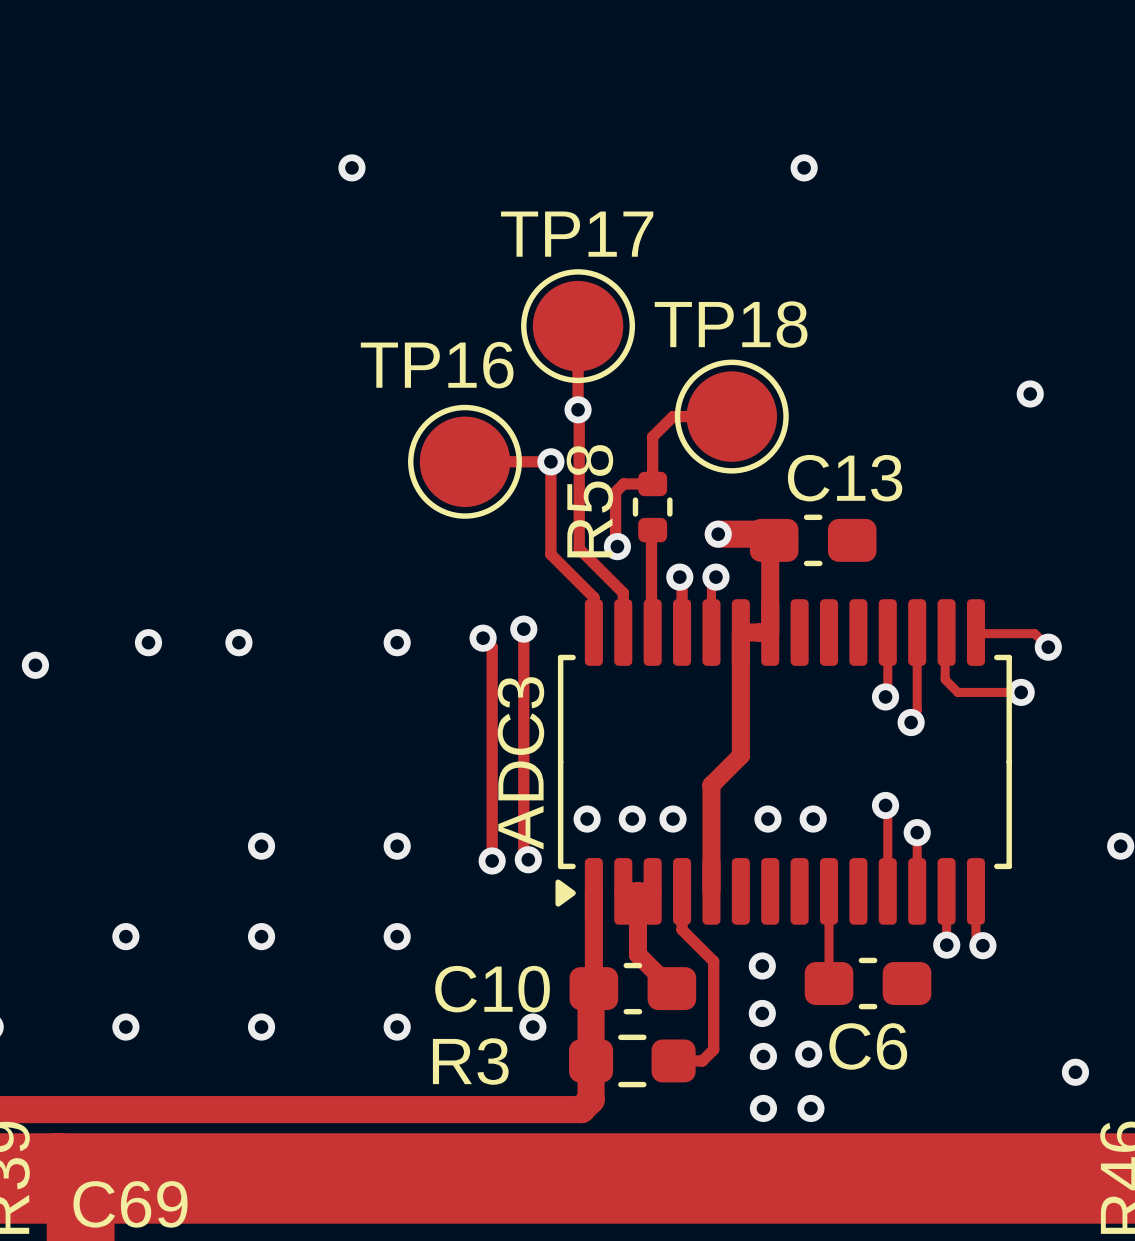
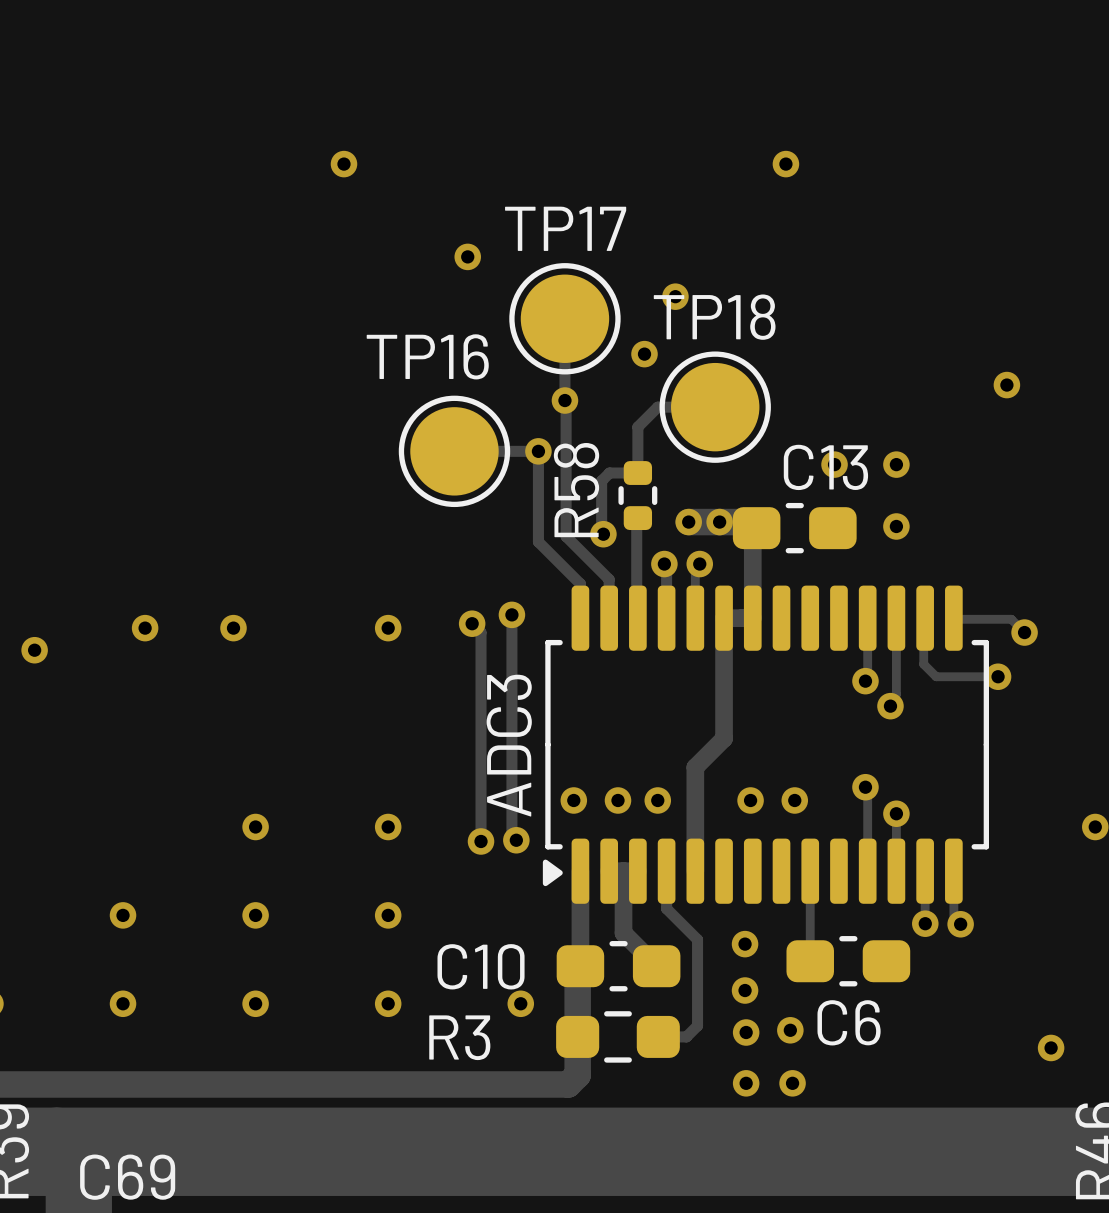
via: none -> (467, 256)
via: none -> (675, 296)
via: none -> (644, 354)
via: none -> (834, 464)
via: none -> (896, 464)
via: none -> (688, 522)
via: (718, 534) -> none
via: none -> (719, 522)
via: none -> (896, 526)

